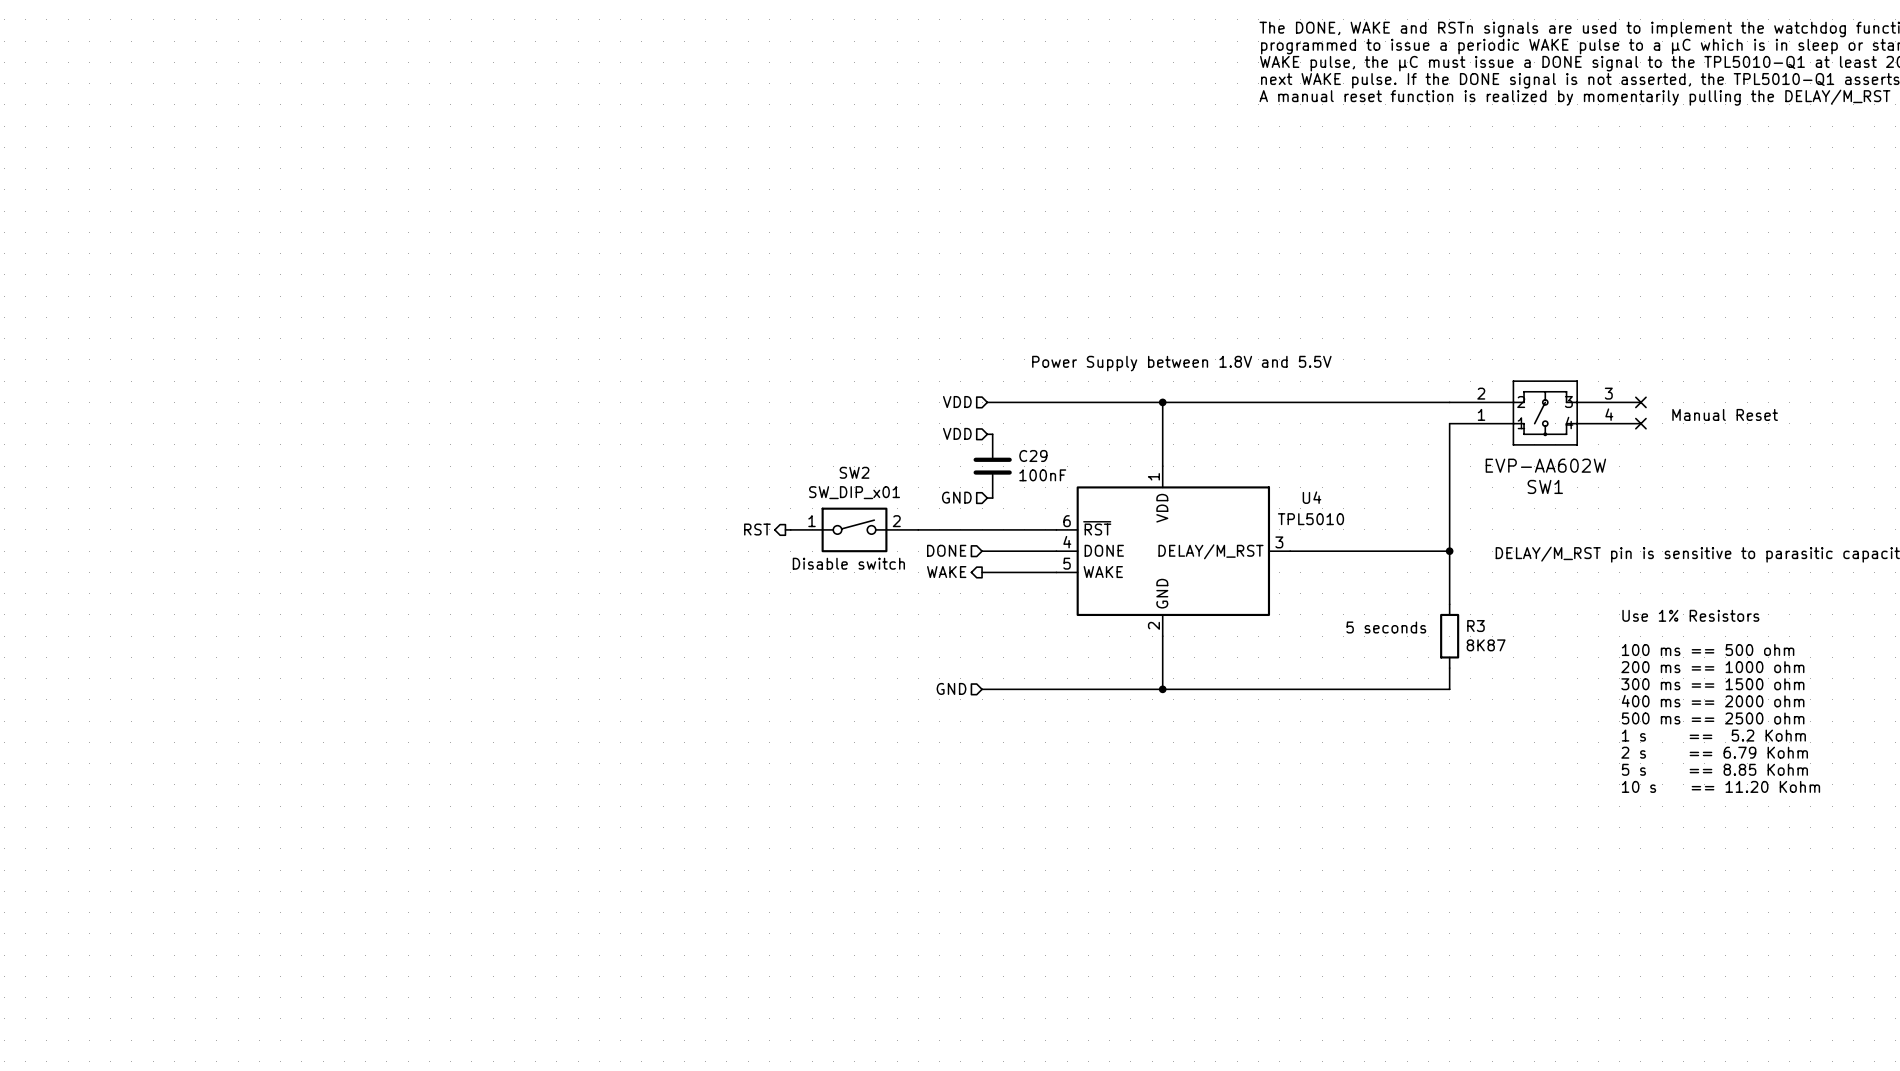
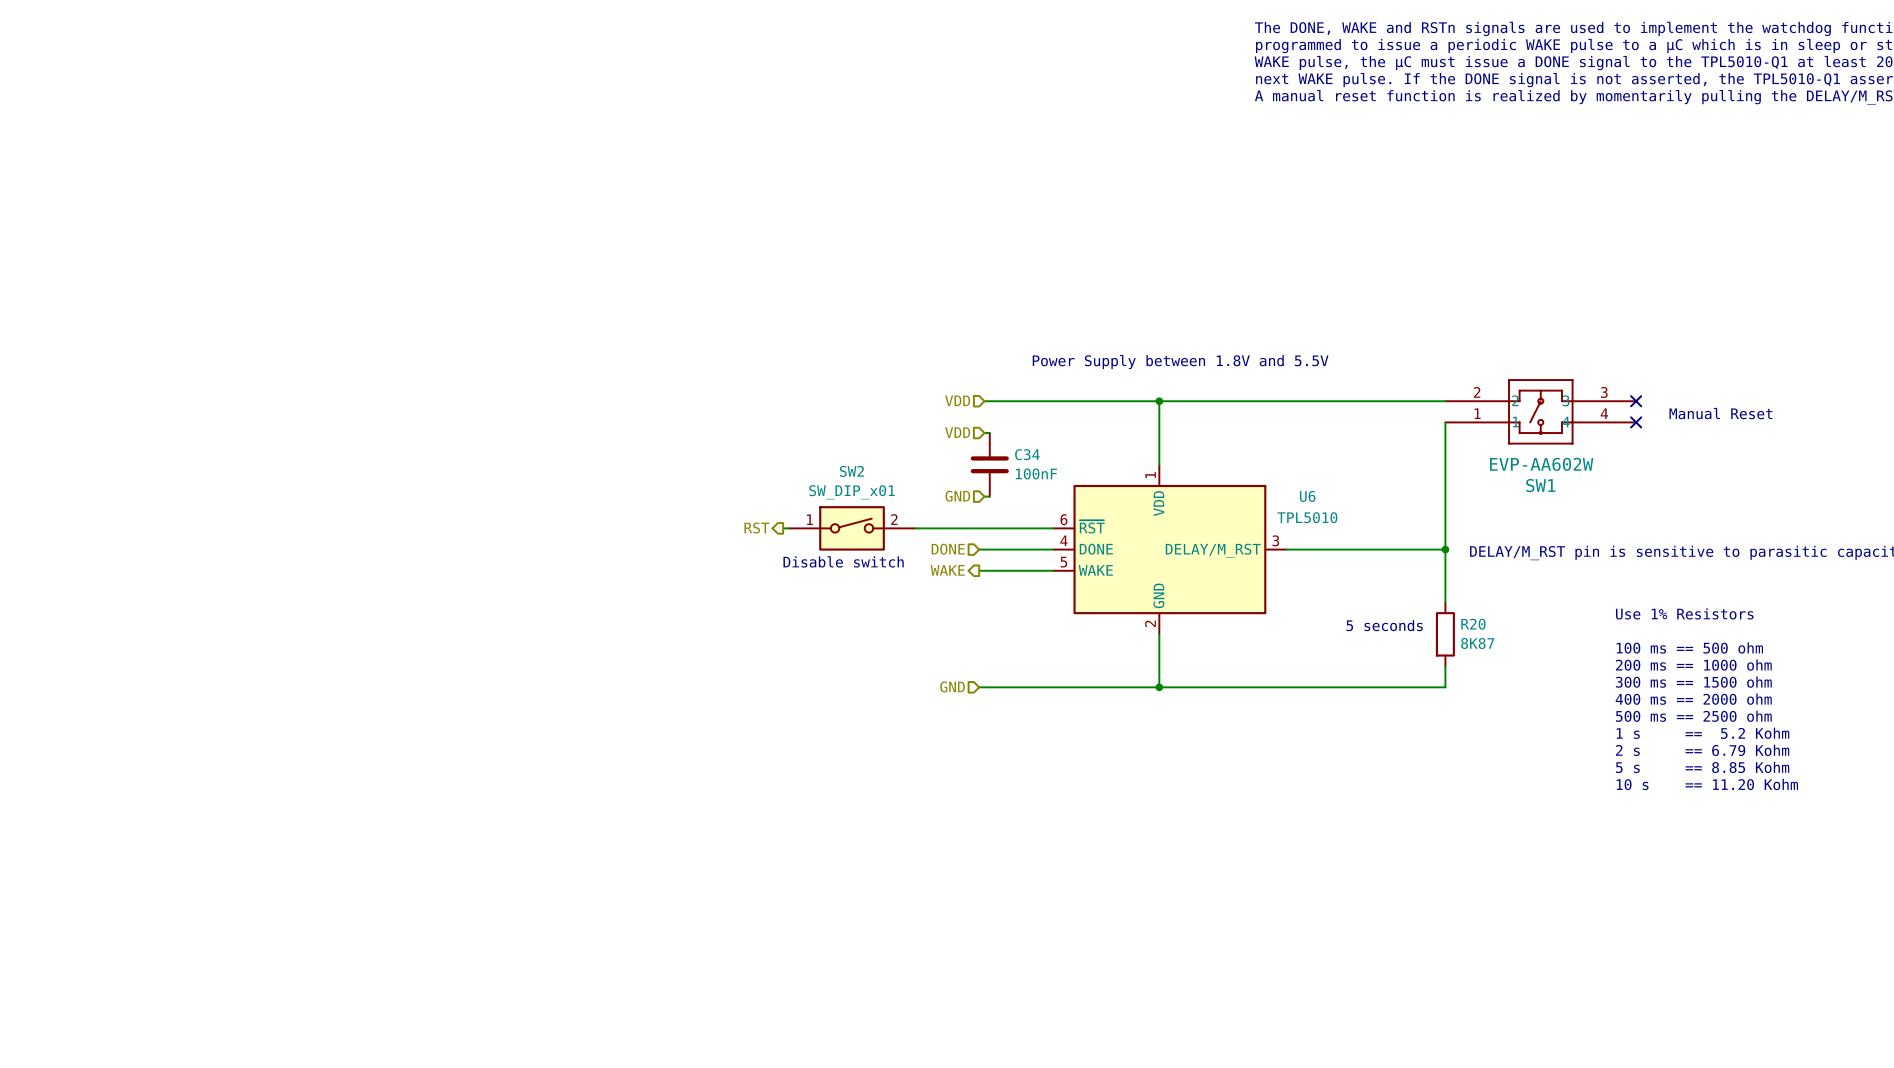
C29 name: C29 (1033, 455) -> C34 (1027, 454)
U4 name: U4 (1311, 497) -> U6 (1307, 496)
R3 name: R3 (1475, 626) -> R20 (1473, 624)

